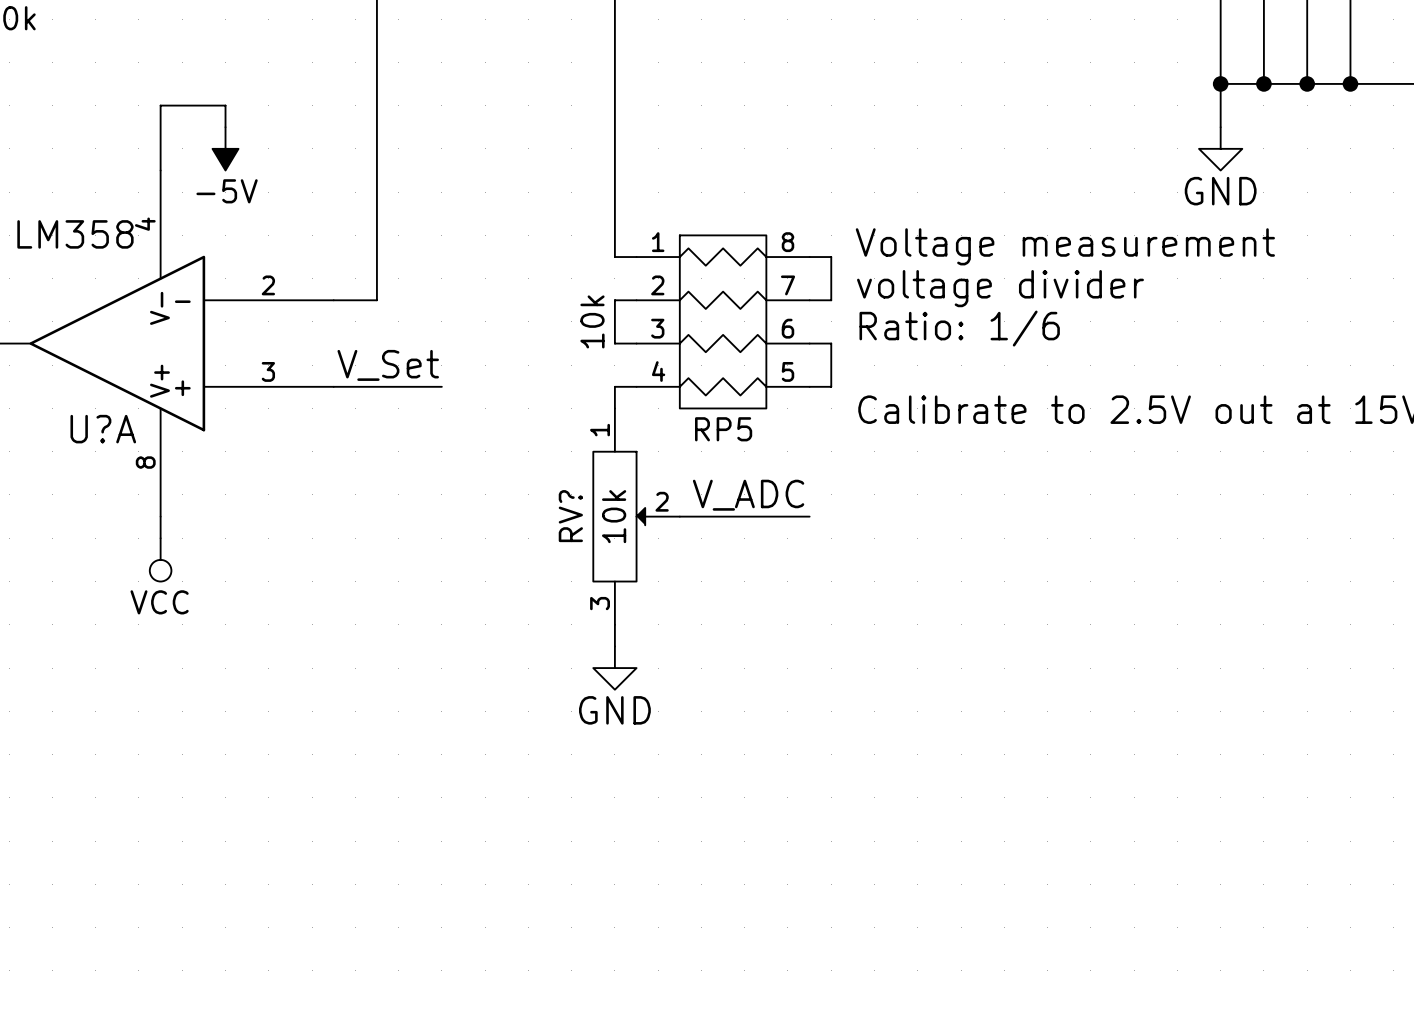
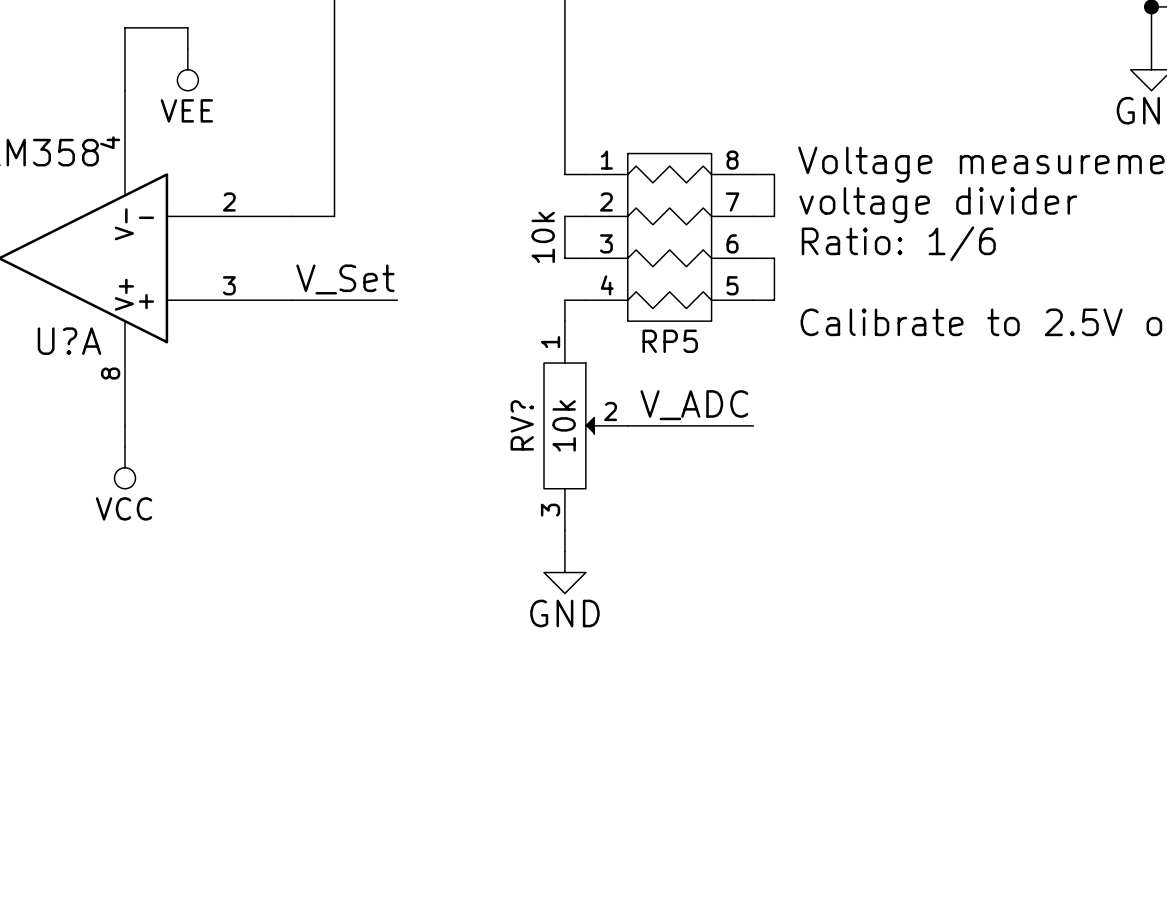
power symbol: -5V (225, 148) -> VEE (187, 69)

